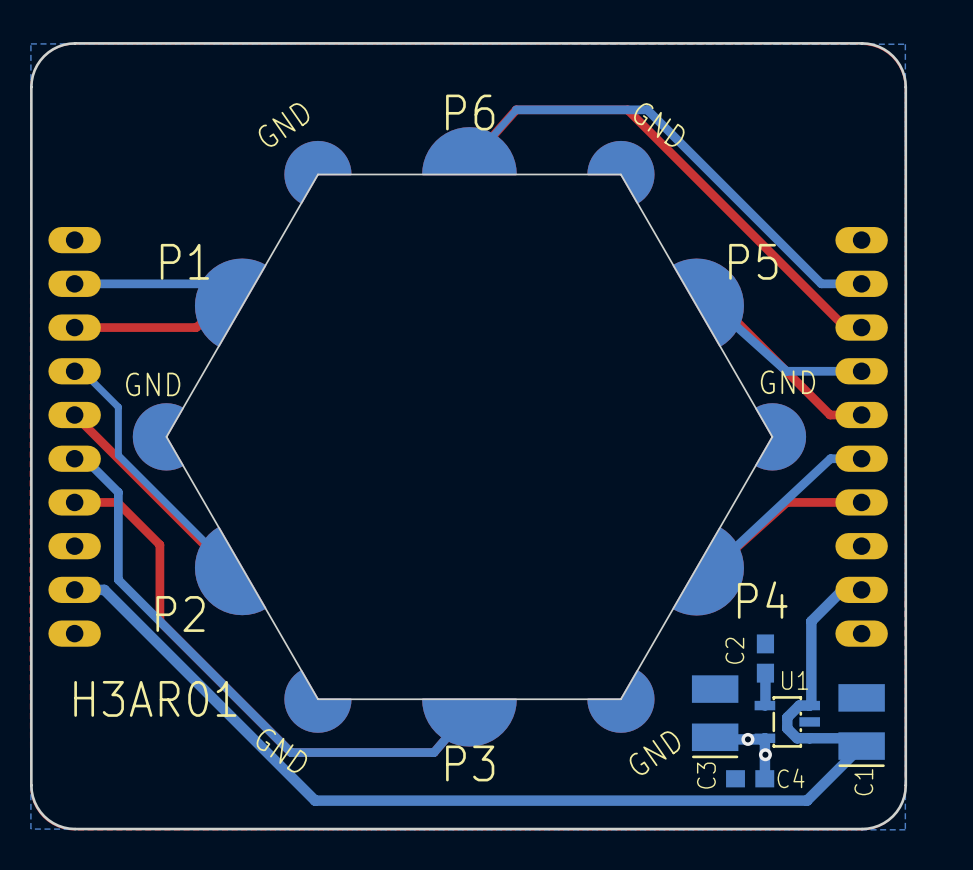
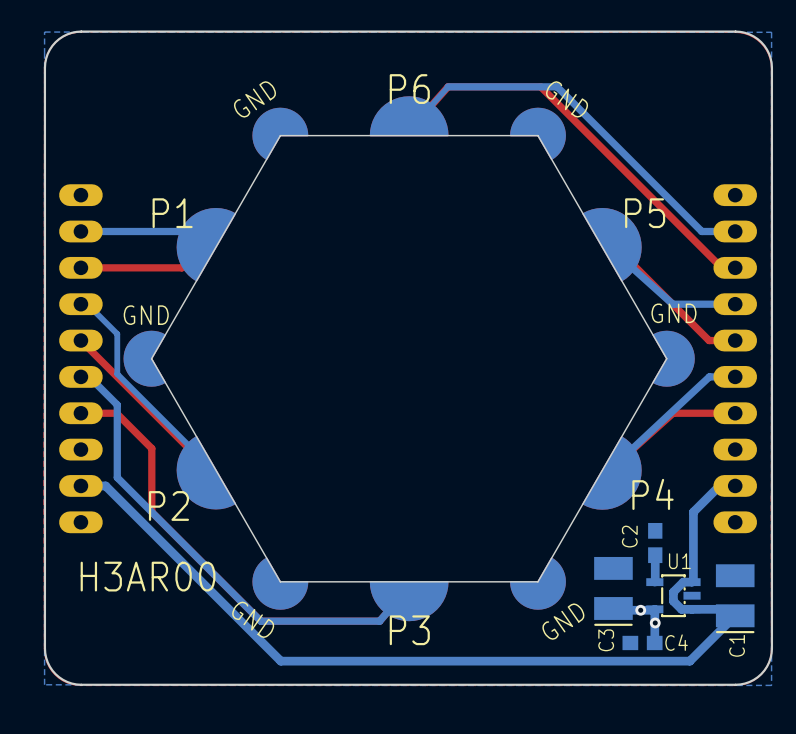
part footprint: [132, 127, 807, 747] -> [123, 96, 695, 622]
text: H3AR01 (155, 698) -> H3AR00 (148, 576)

